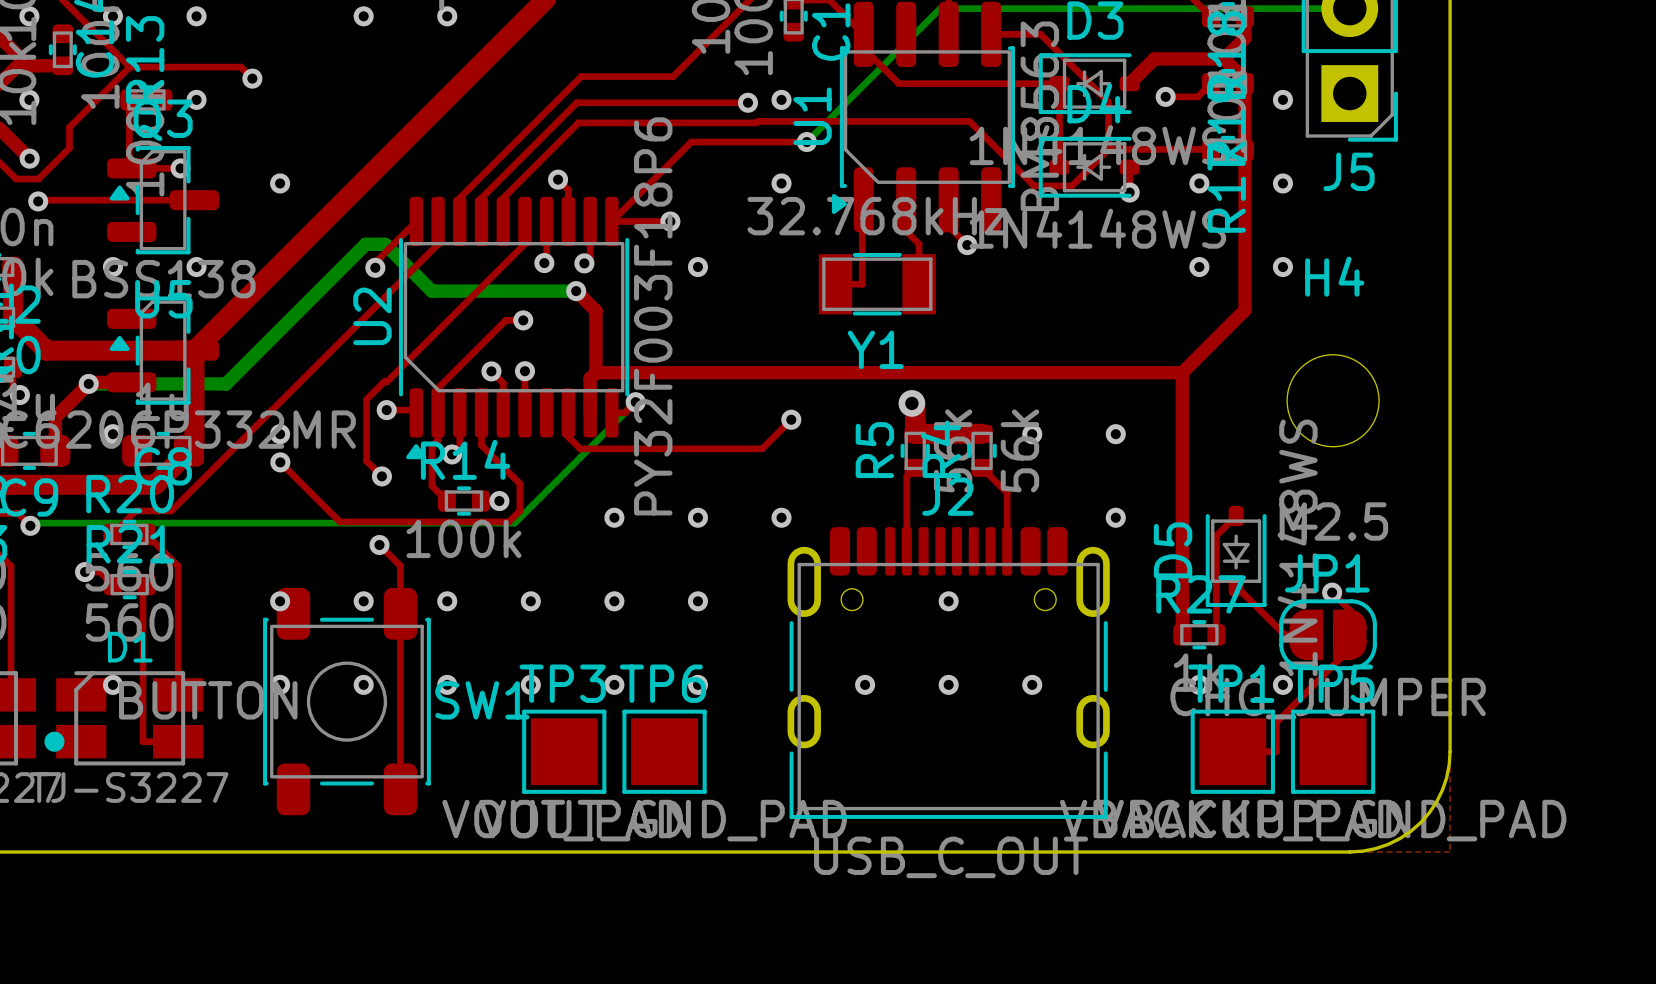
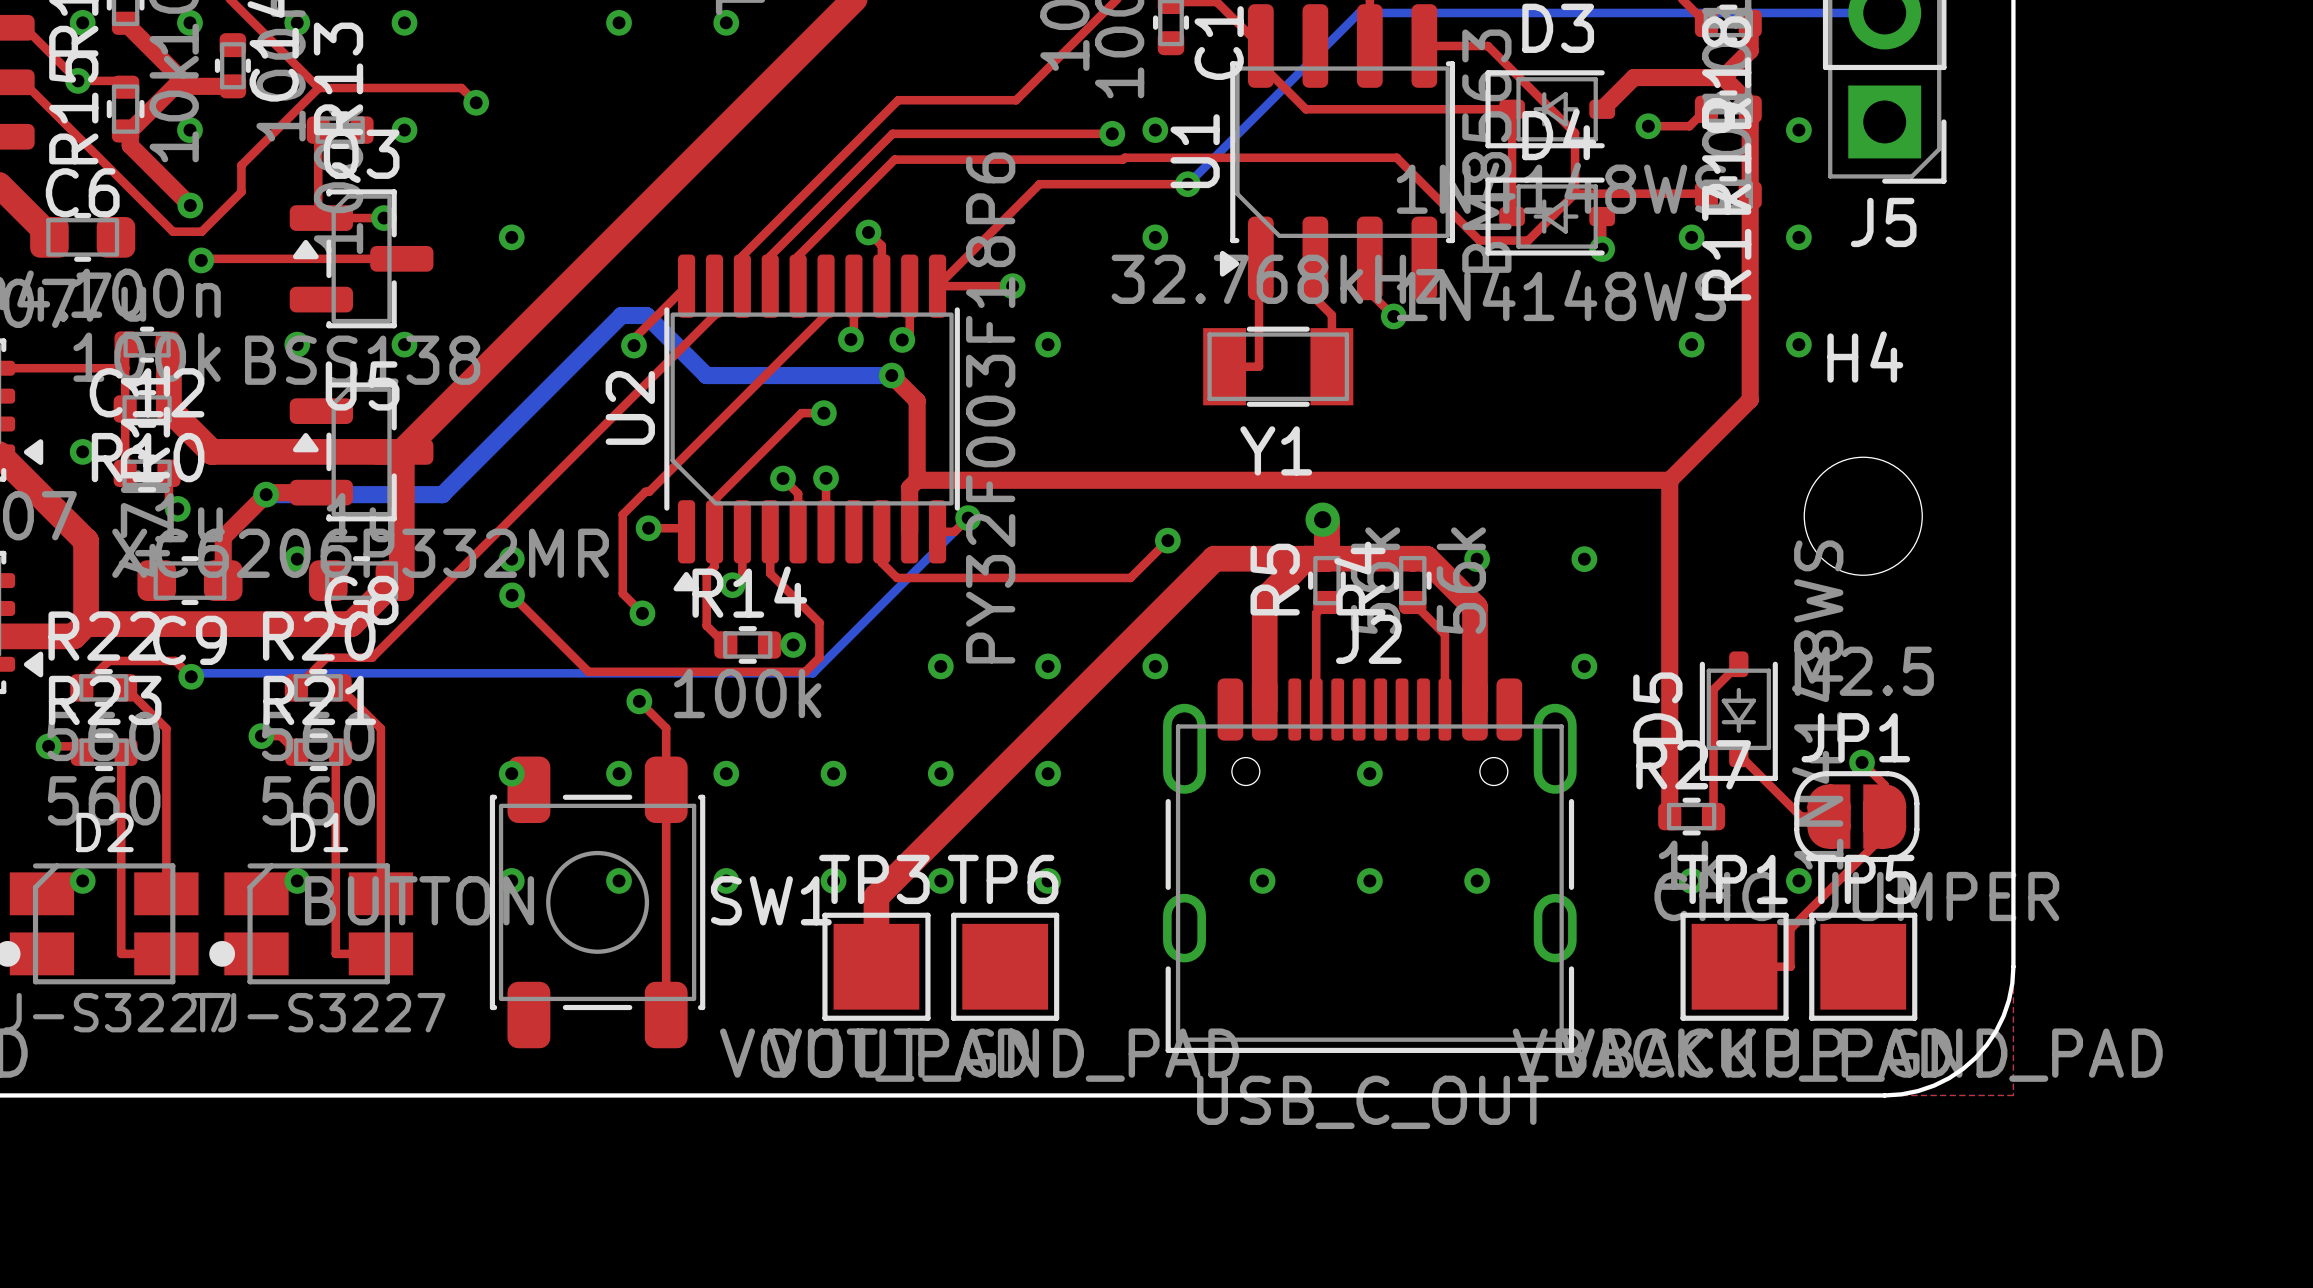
top track: none -> (1305, 558) (1264, 599) (1264, 709)
top track: none -> (1326, 558) (1214, 558) (876, 896) (876, 966)
top track: none -> (1412, 558) (1426, 558) (1474, 607) (1474, 709)

